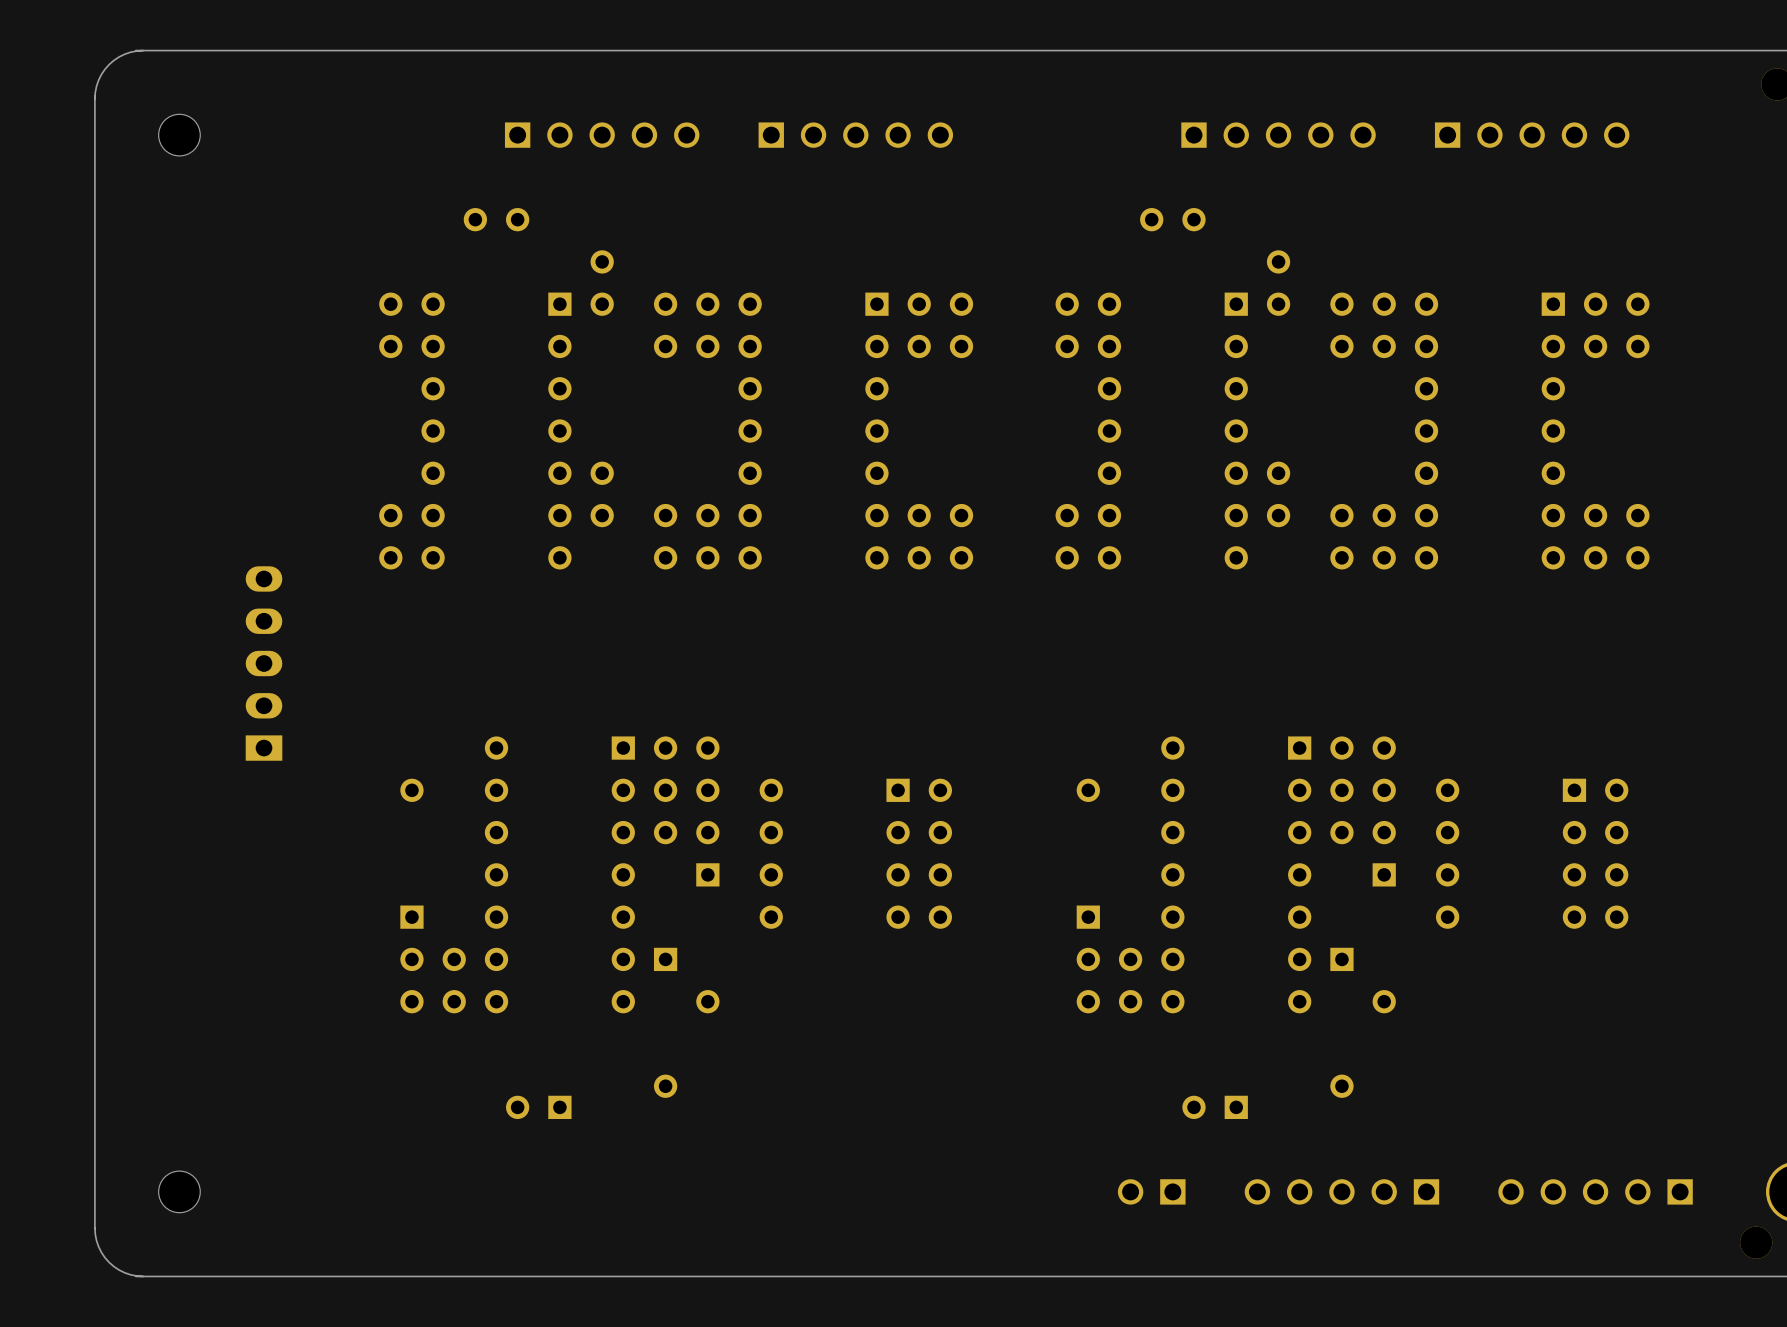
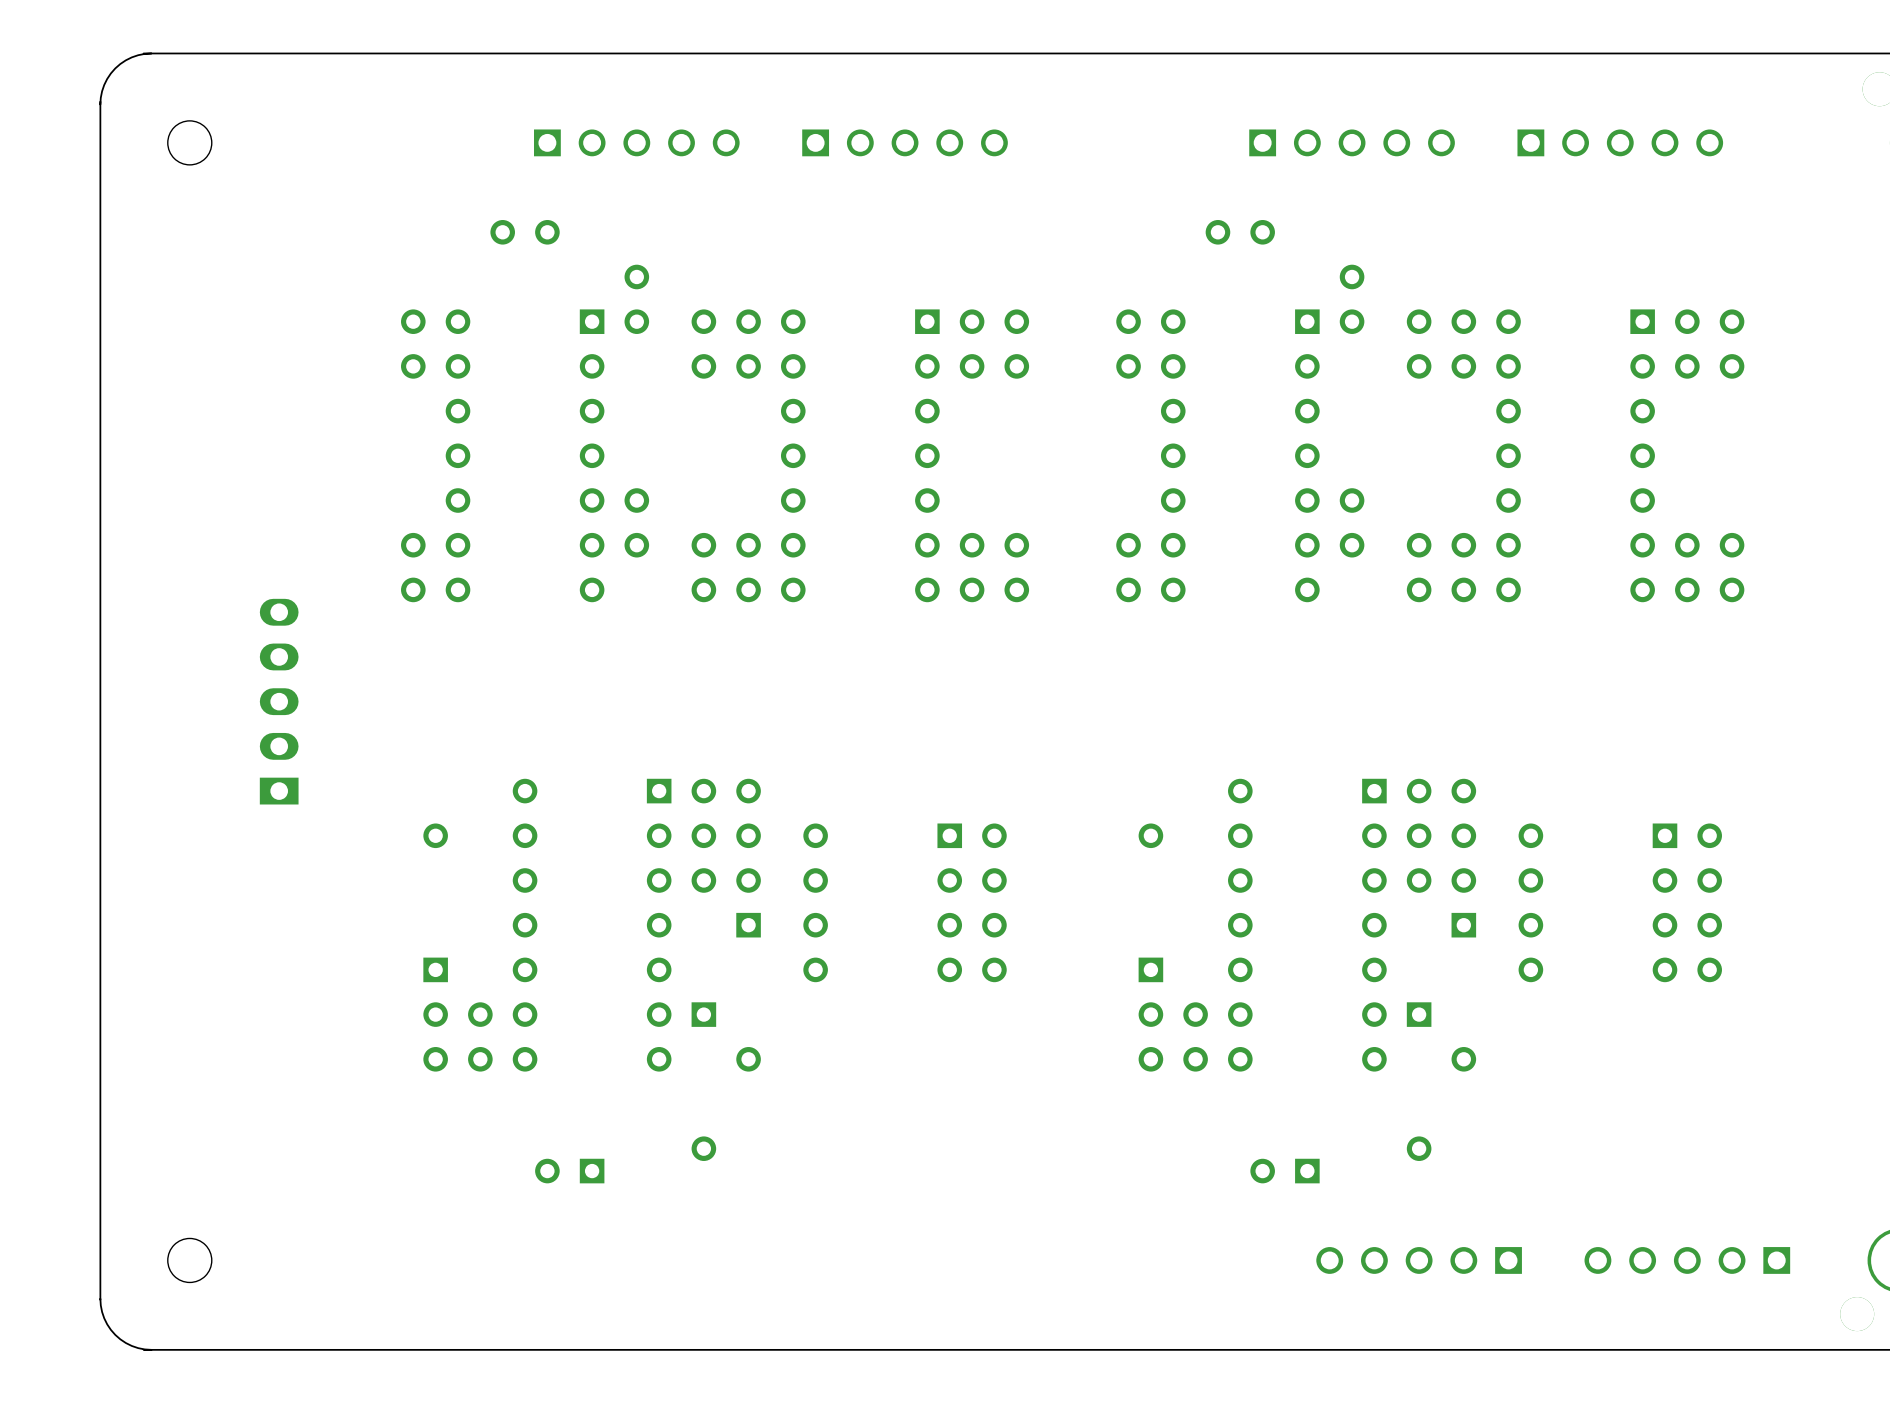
part: (1151, 1191) -> none

